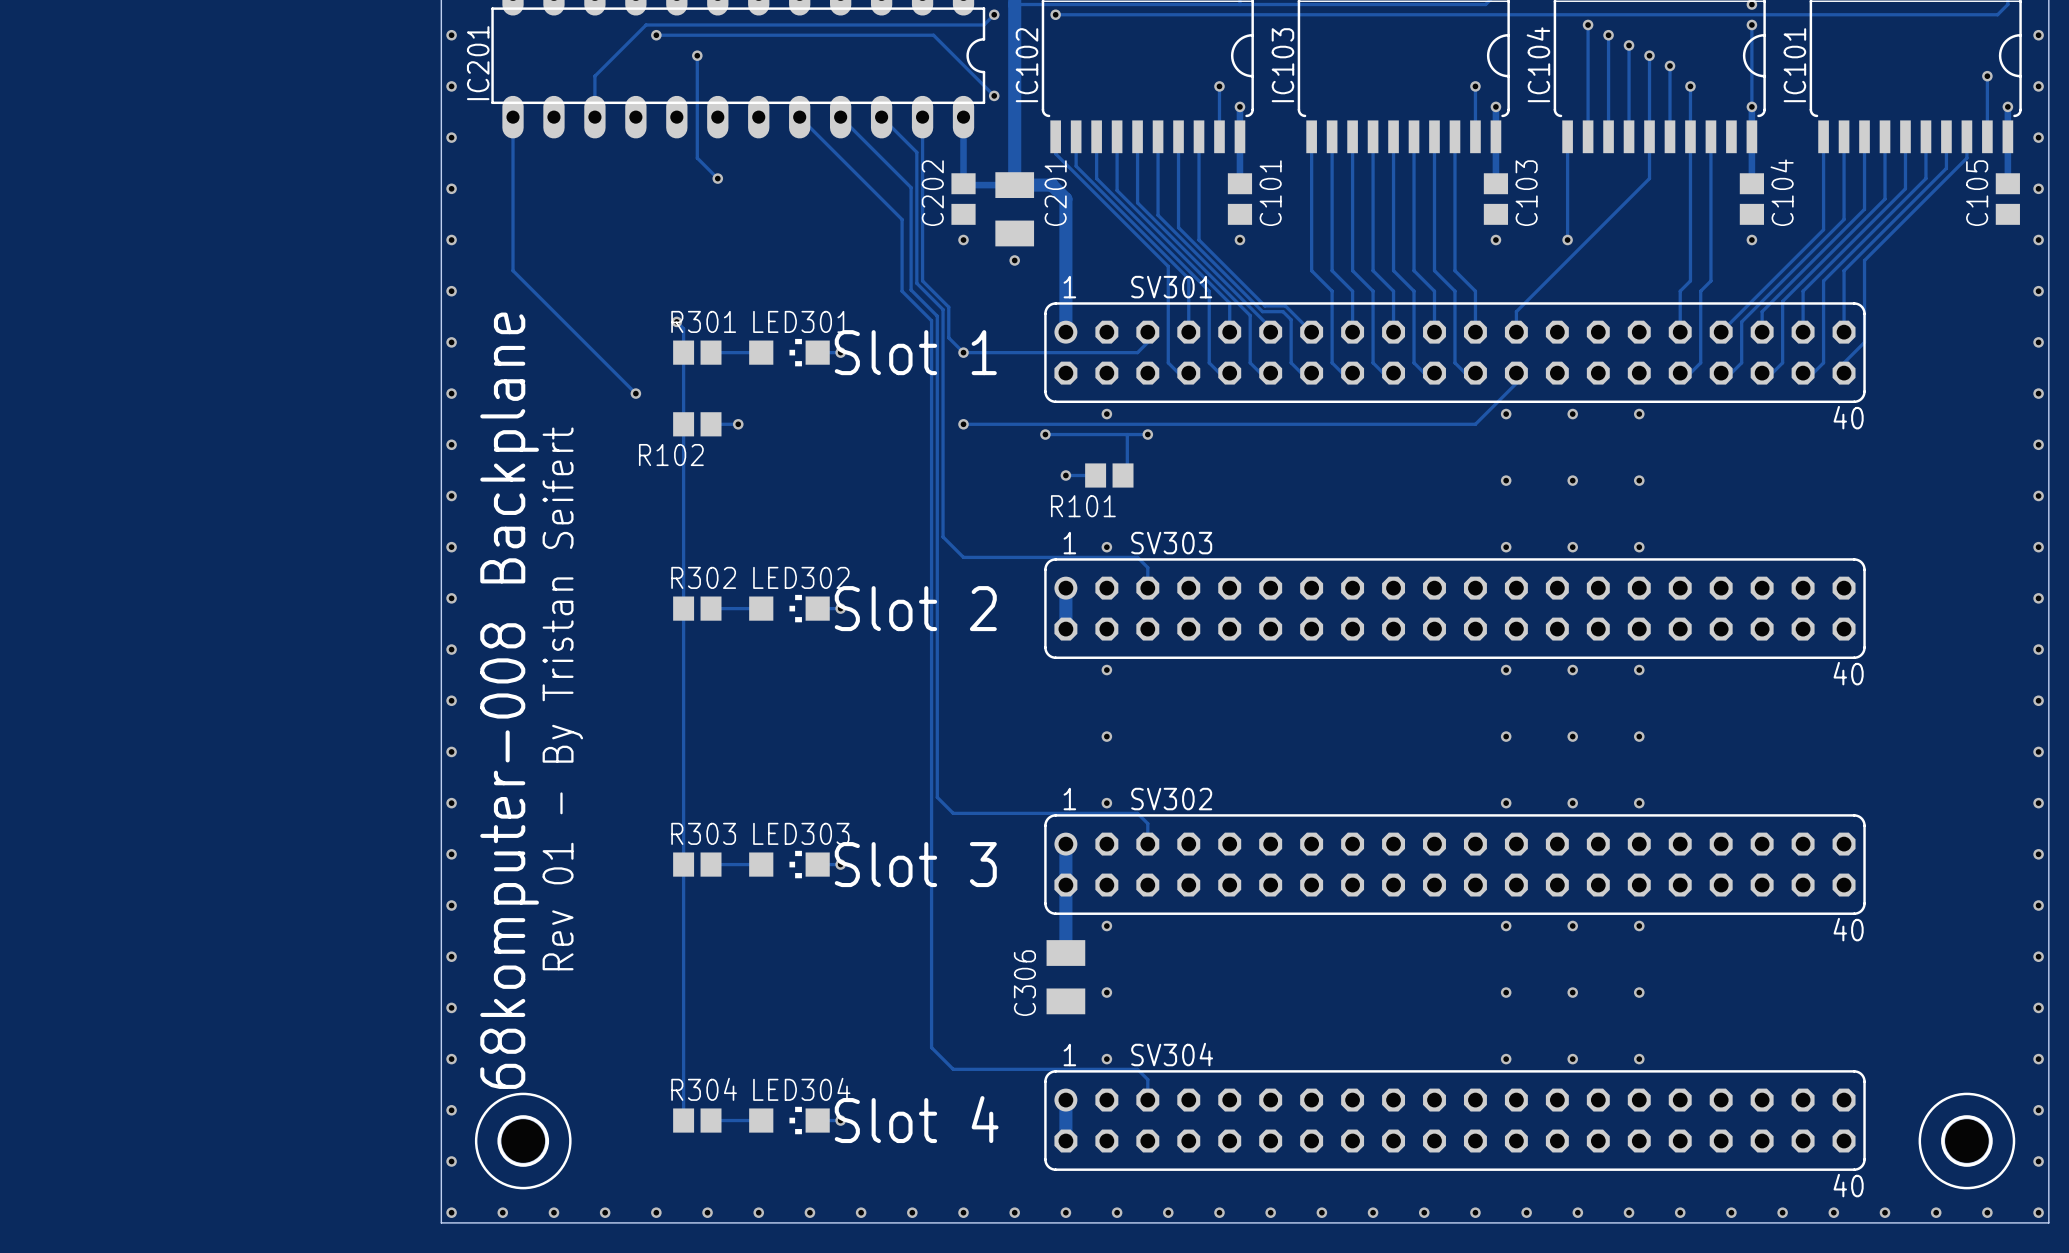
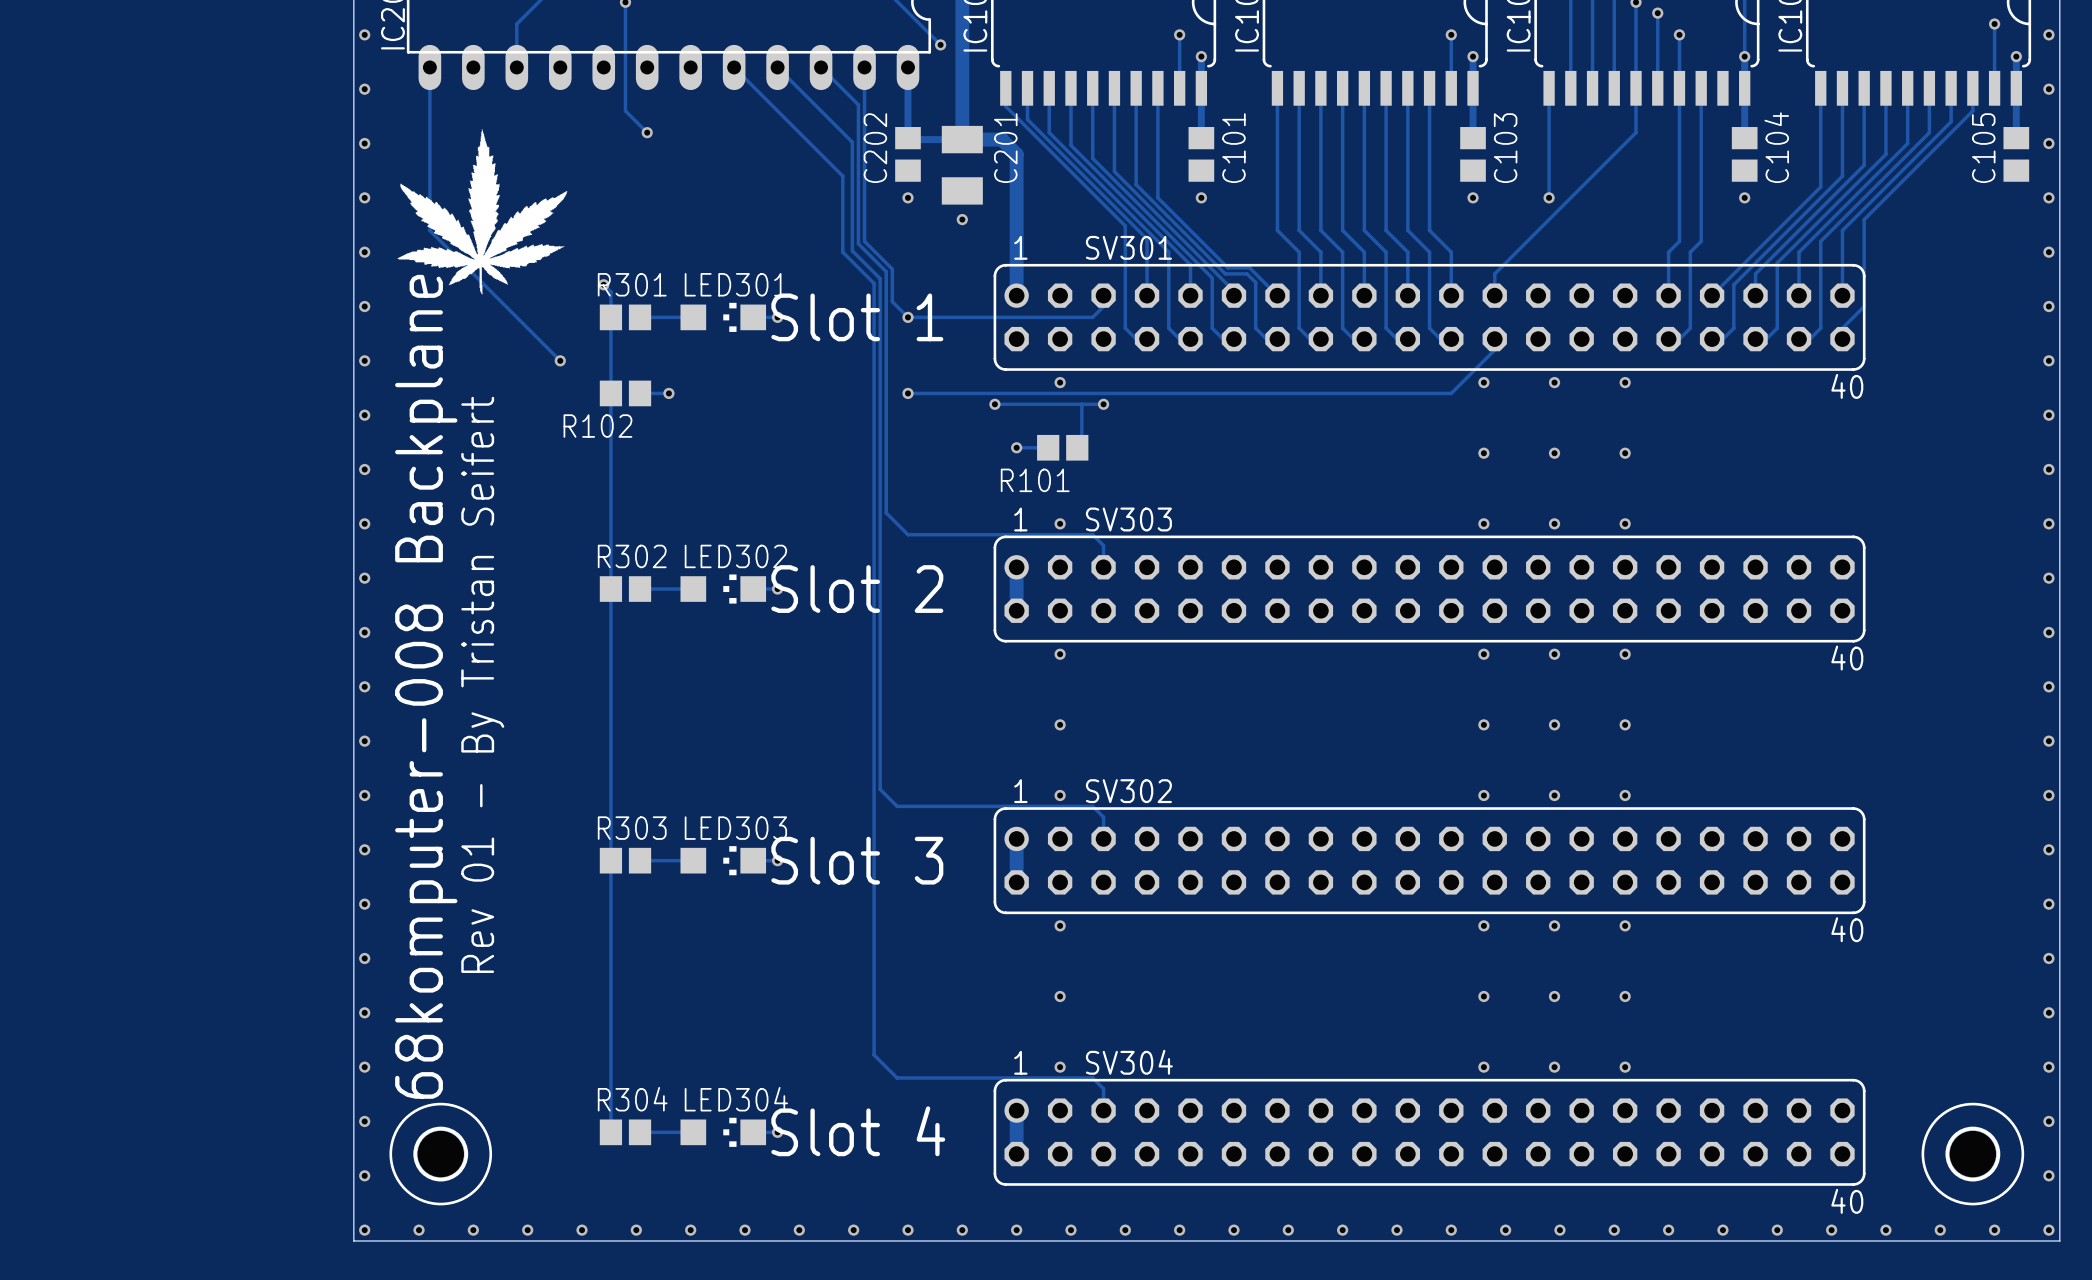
drawing: none -> [397, 129, 568, 295]
track: (1065, 885) (1065, 953) -> none
C306: (1065, 977) -> none

